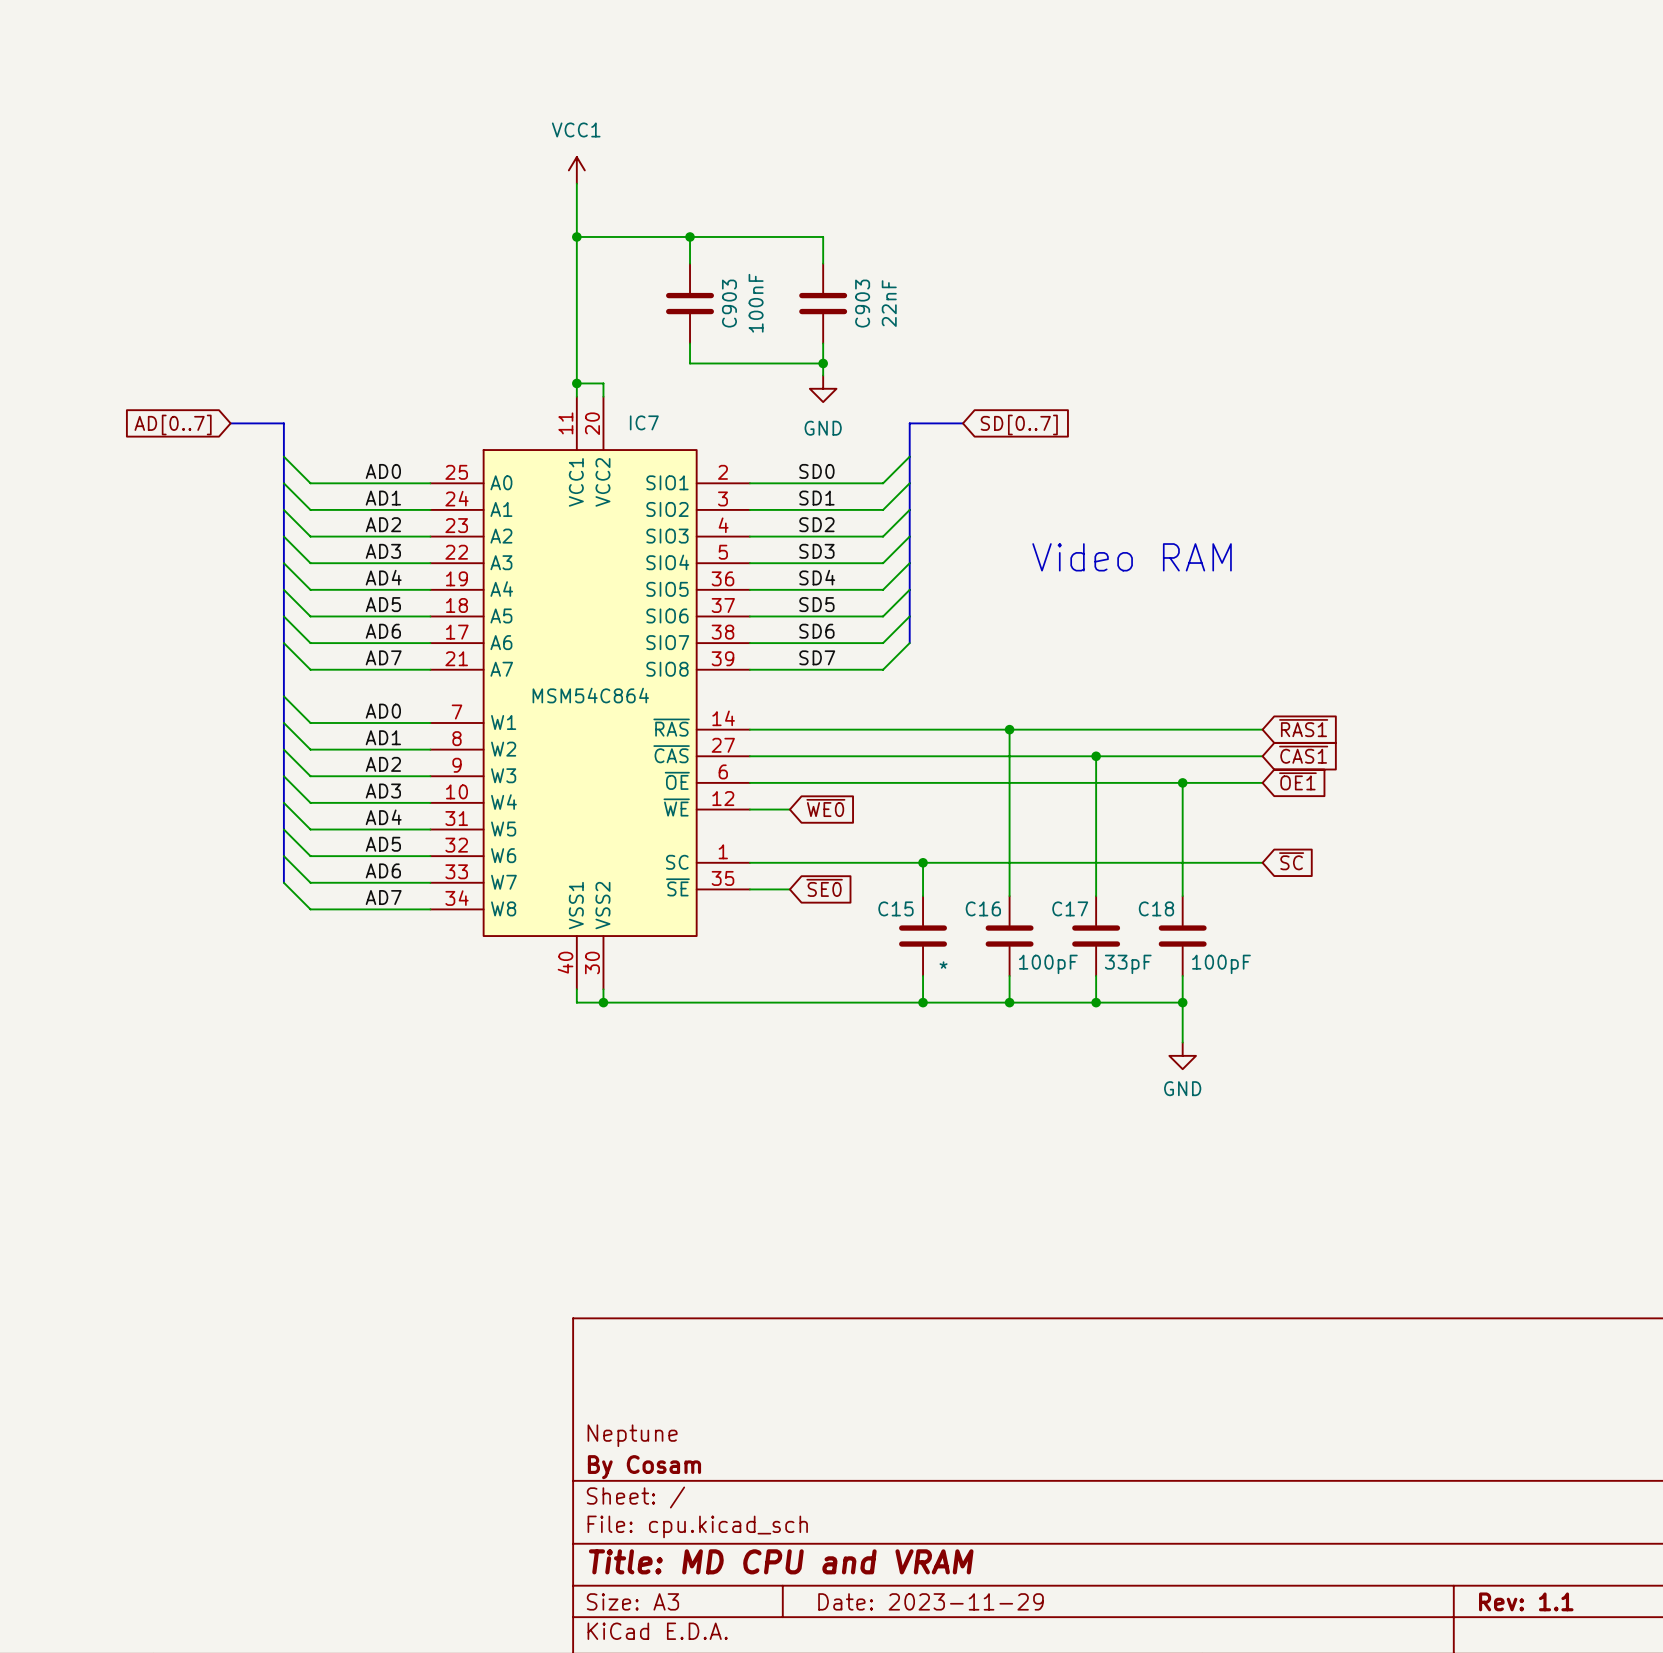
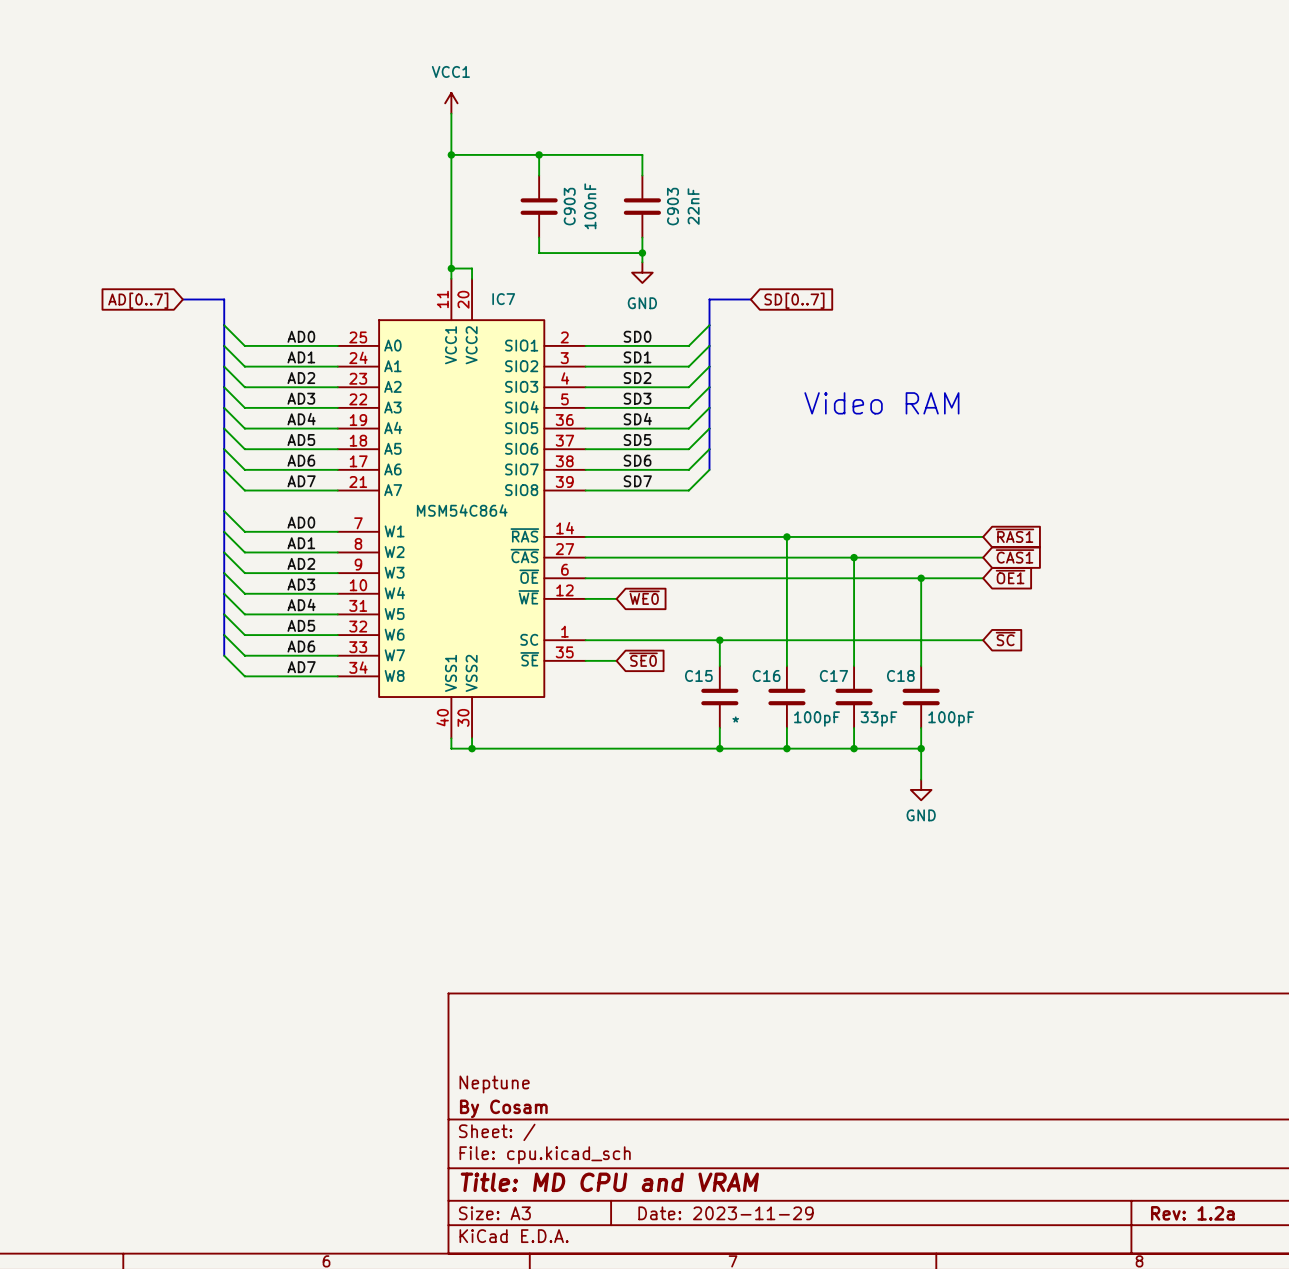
title block: Rev: 1.1 (1526, 1601) -> Rev: 1.2a (1192, 1213)

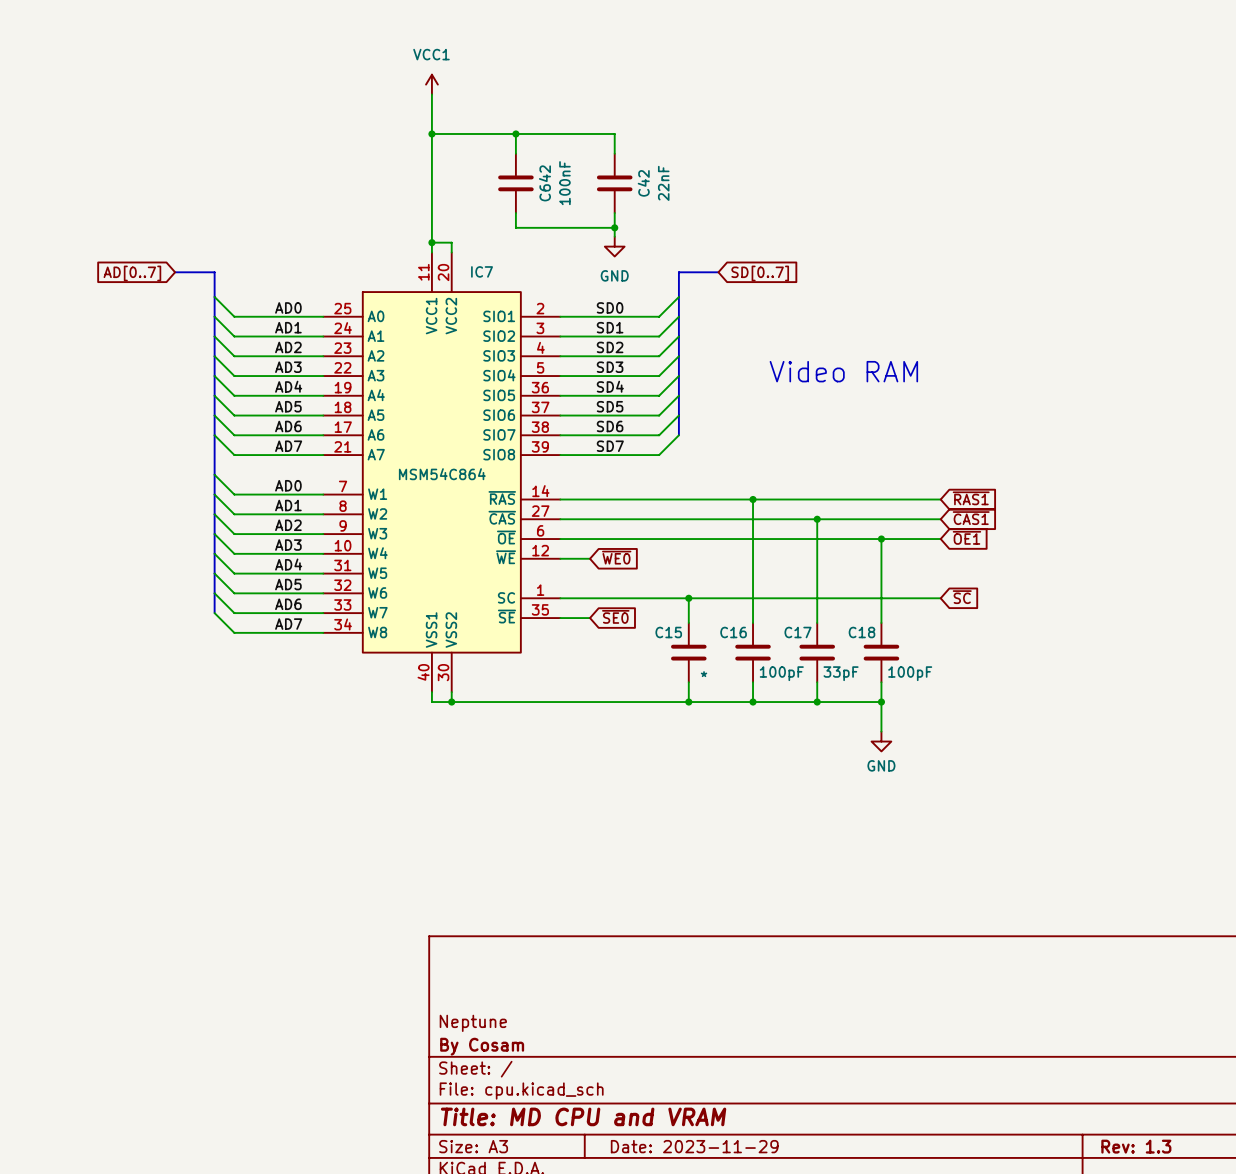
C903 name: C903 (569, 206) -> C642 (544, 183)
C903 name: C903 (672, 206) -> C42 (643, 183)
title block: Rev: 1.2a (1192, 1213) -> Rev: 1.3 (1136, 1146)

